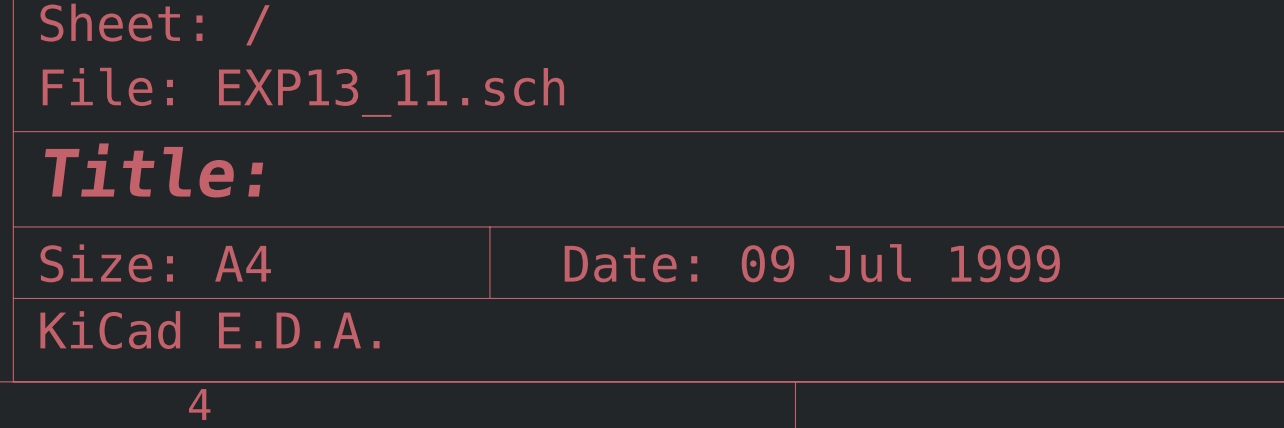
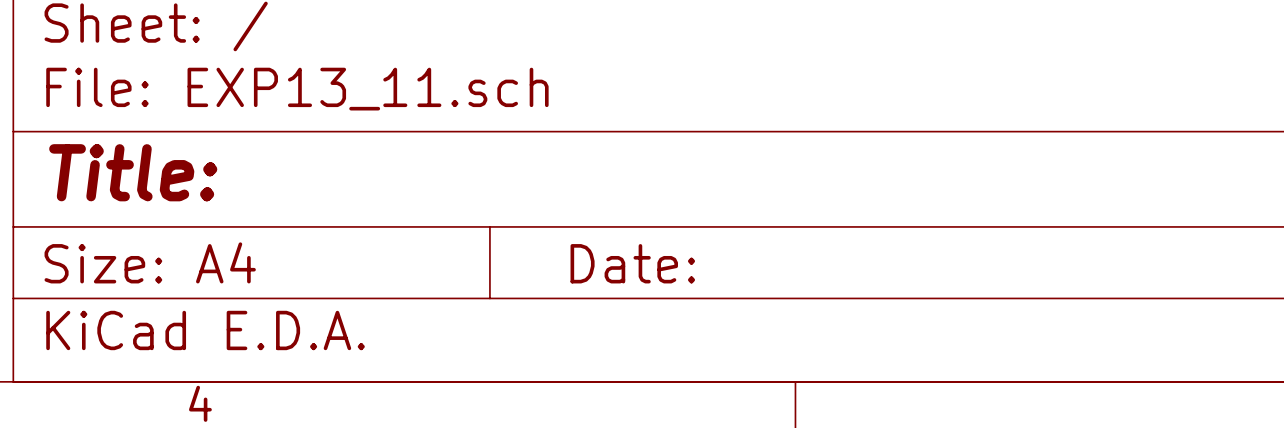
title block: Date: 09 Jul 1999 (812, 263) -> Date: (632, 263)

